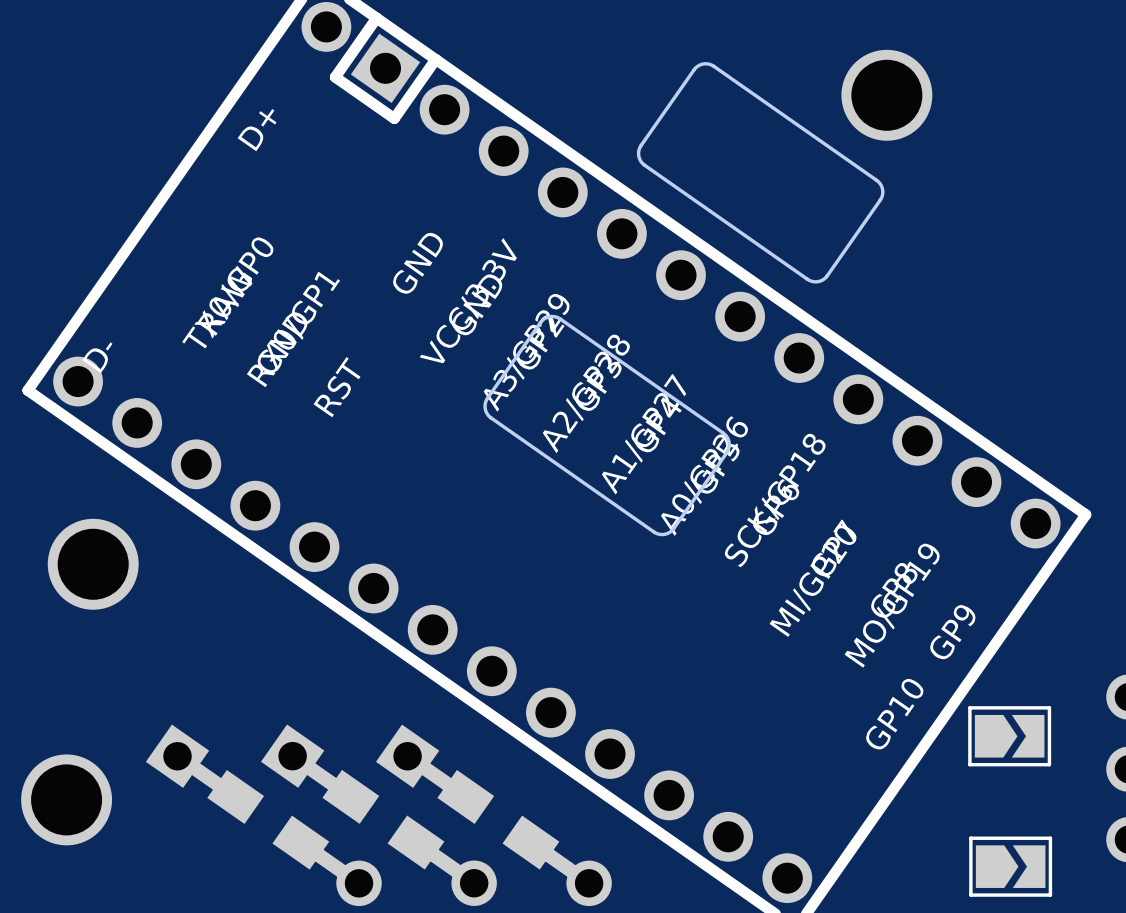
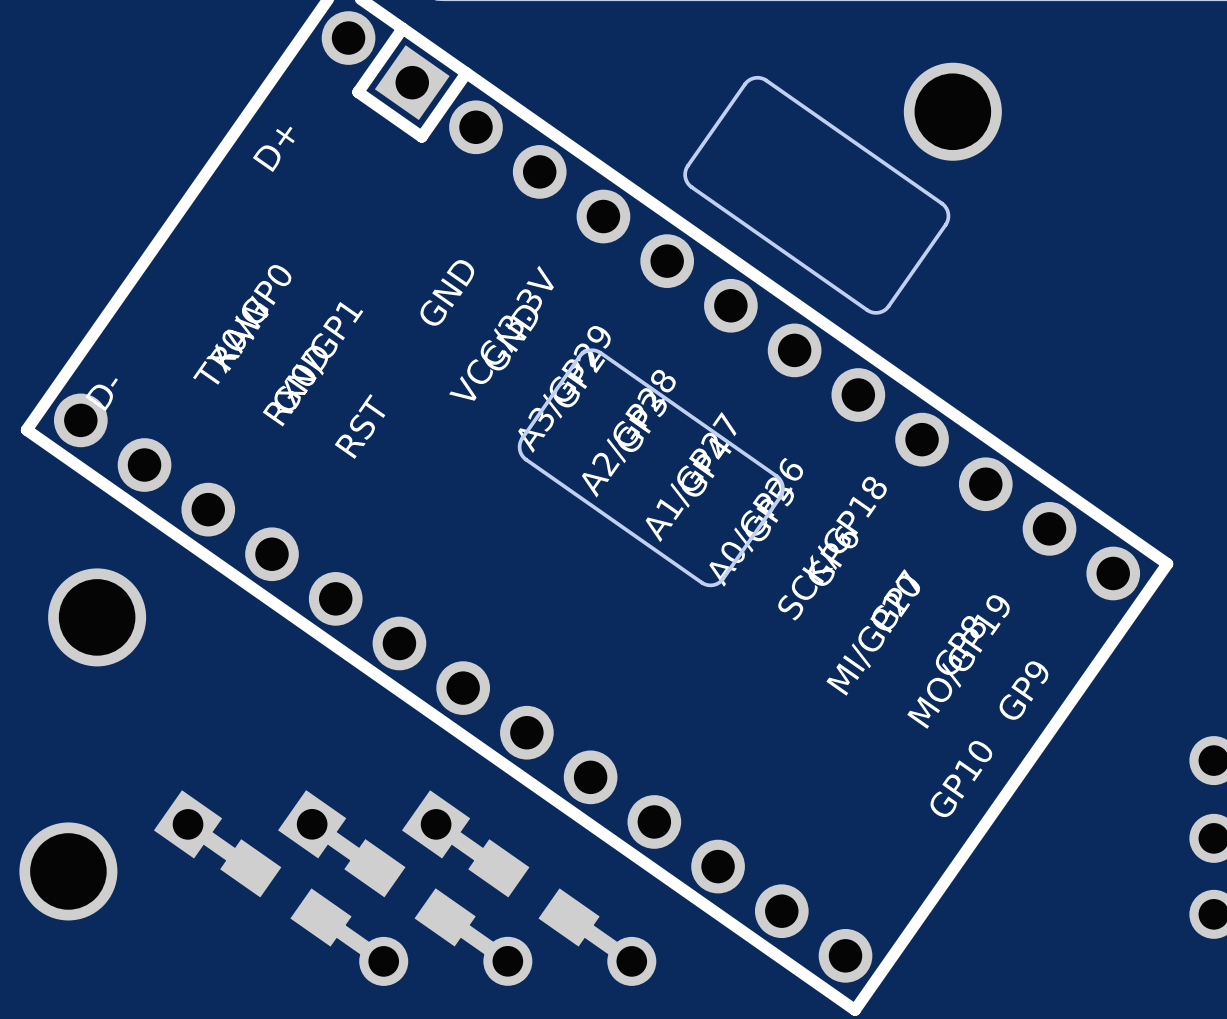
part: (1009, 736) -> none
part: (1010, 866) -> none

